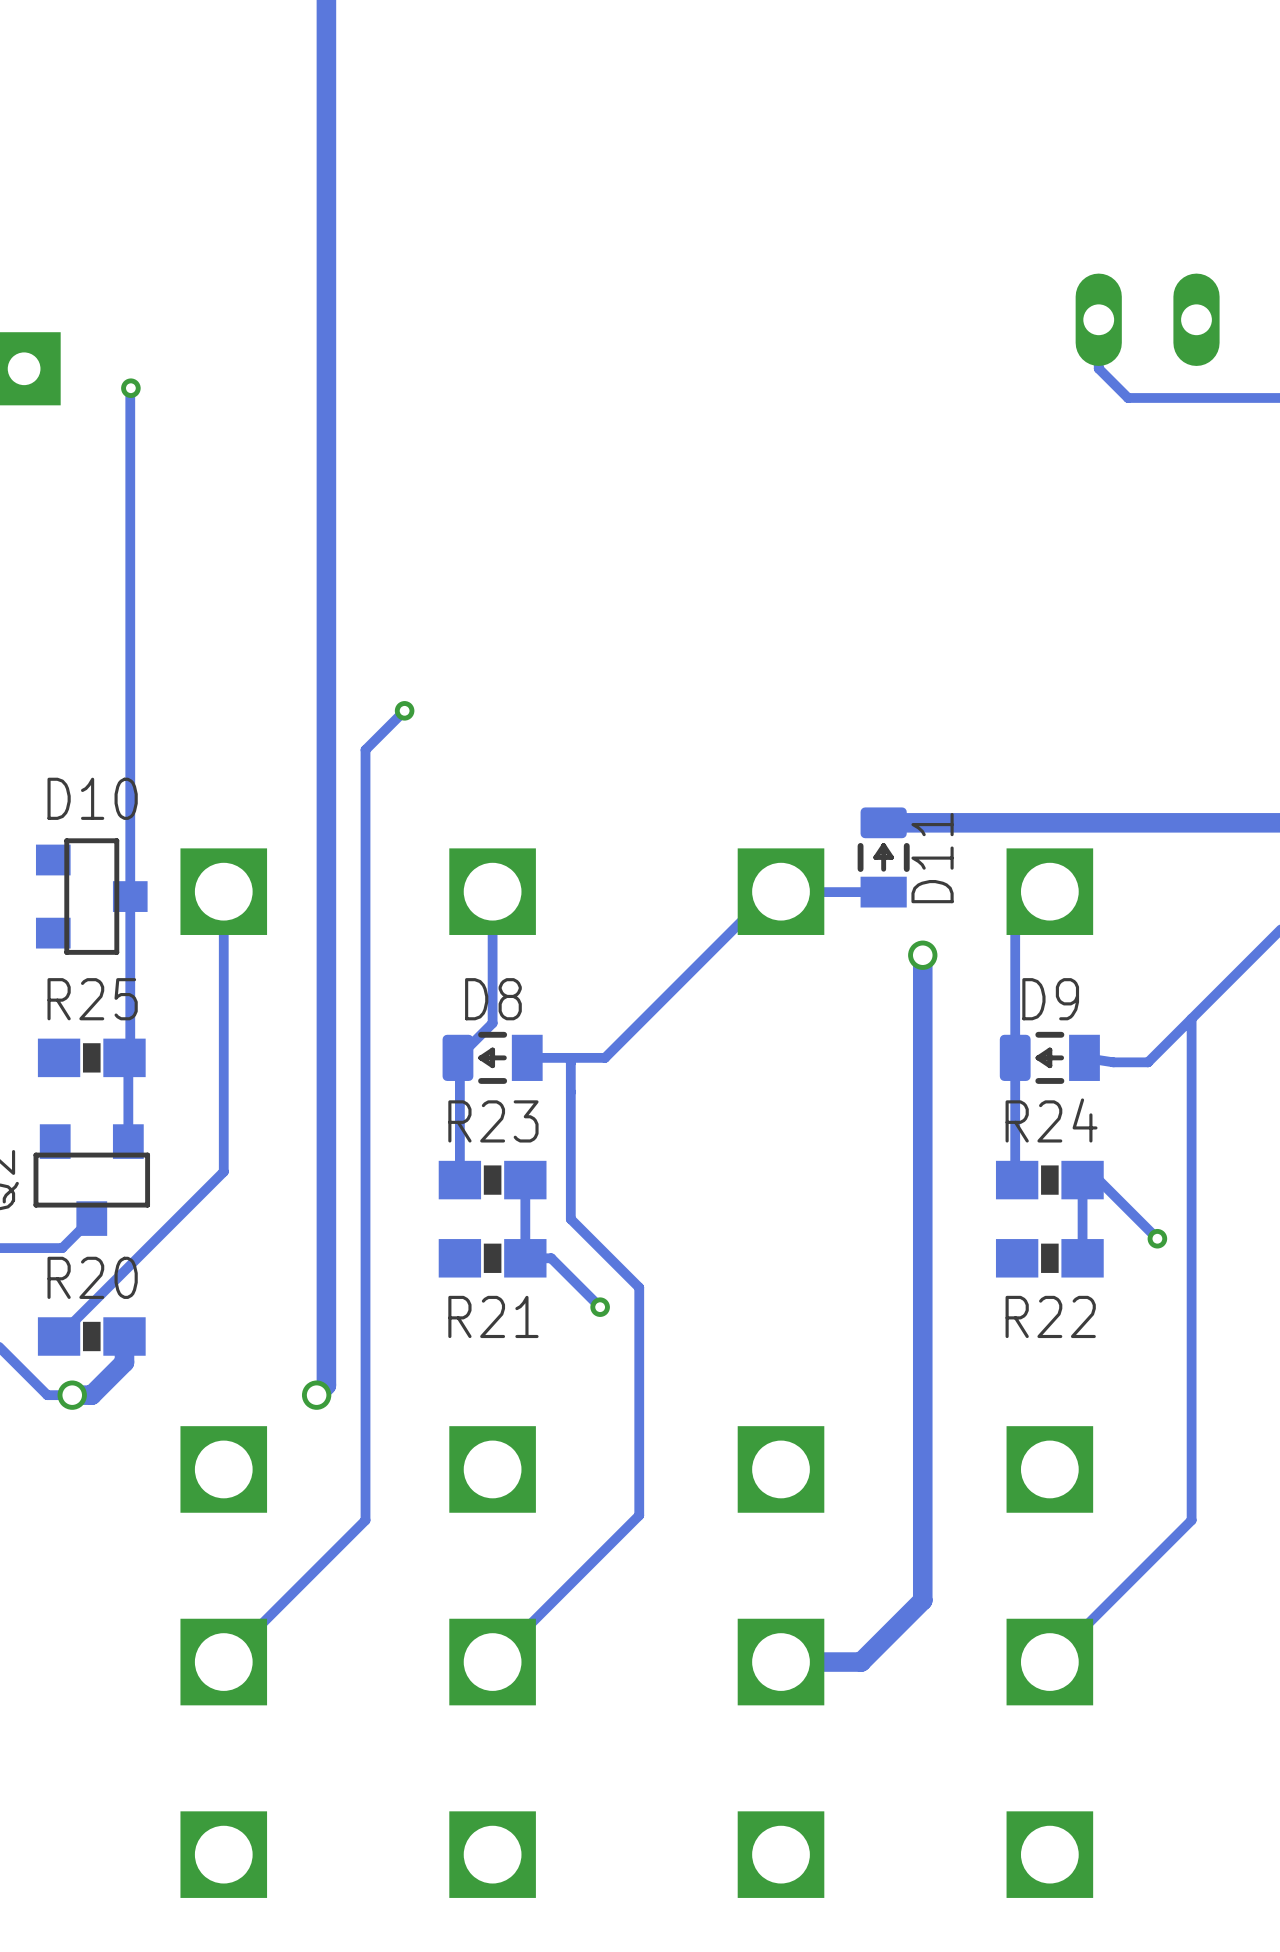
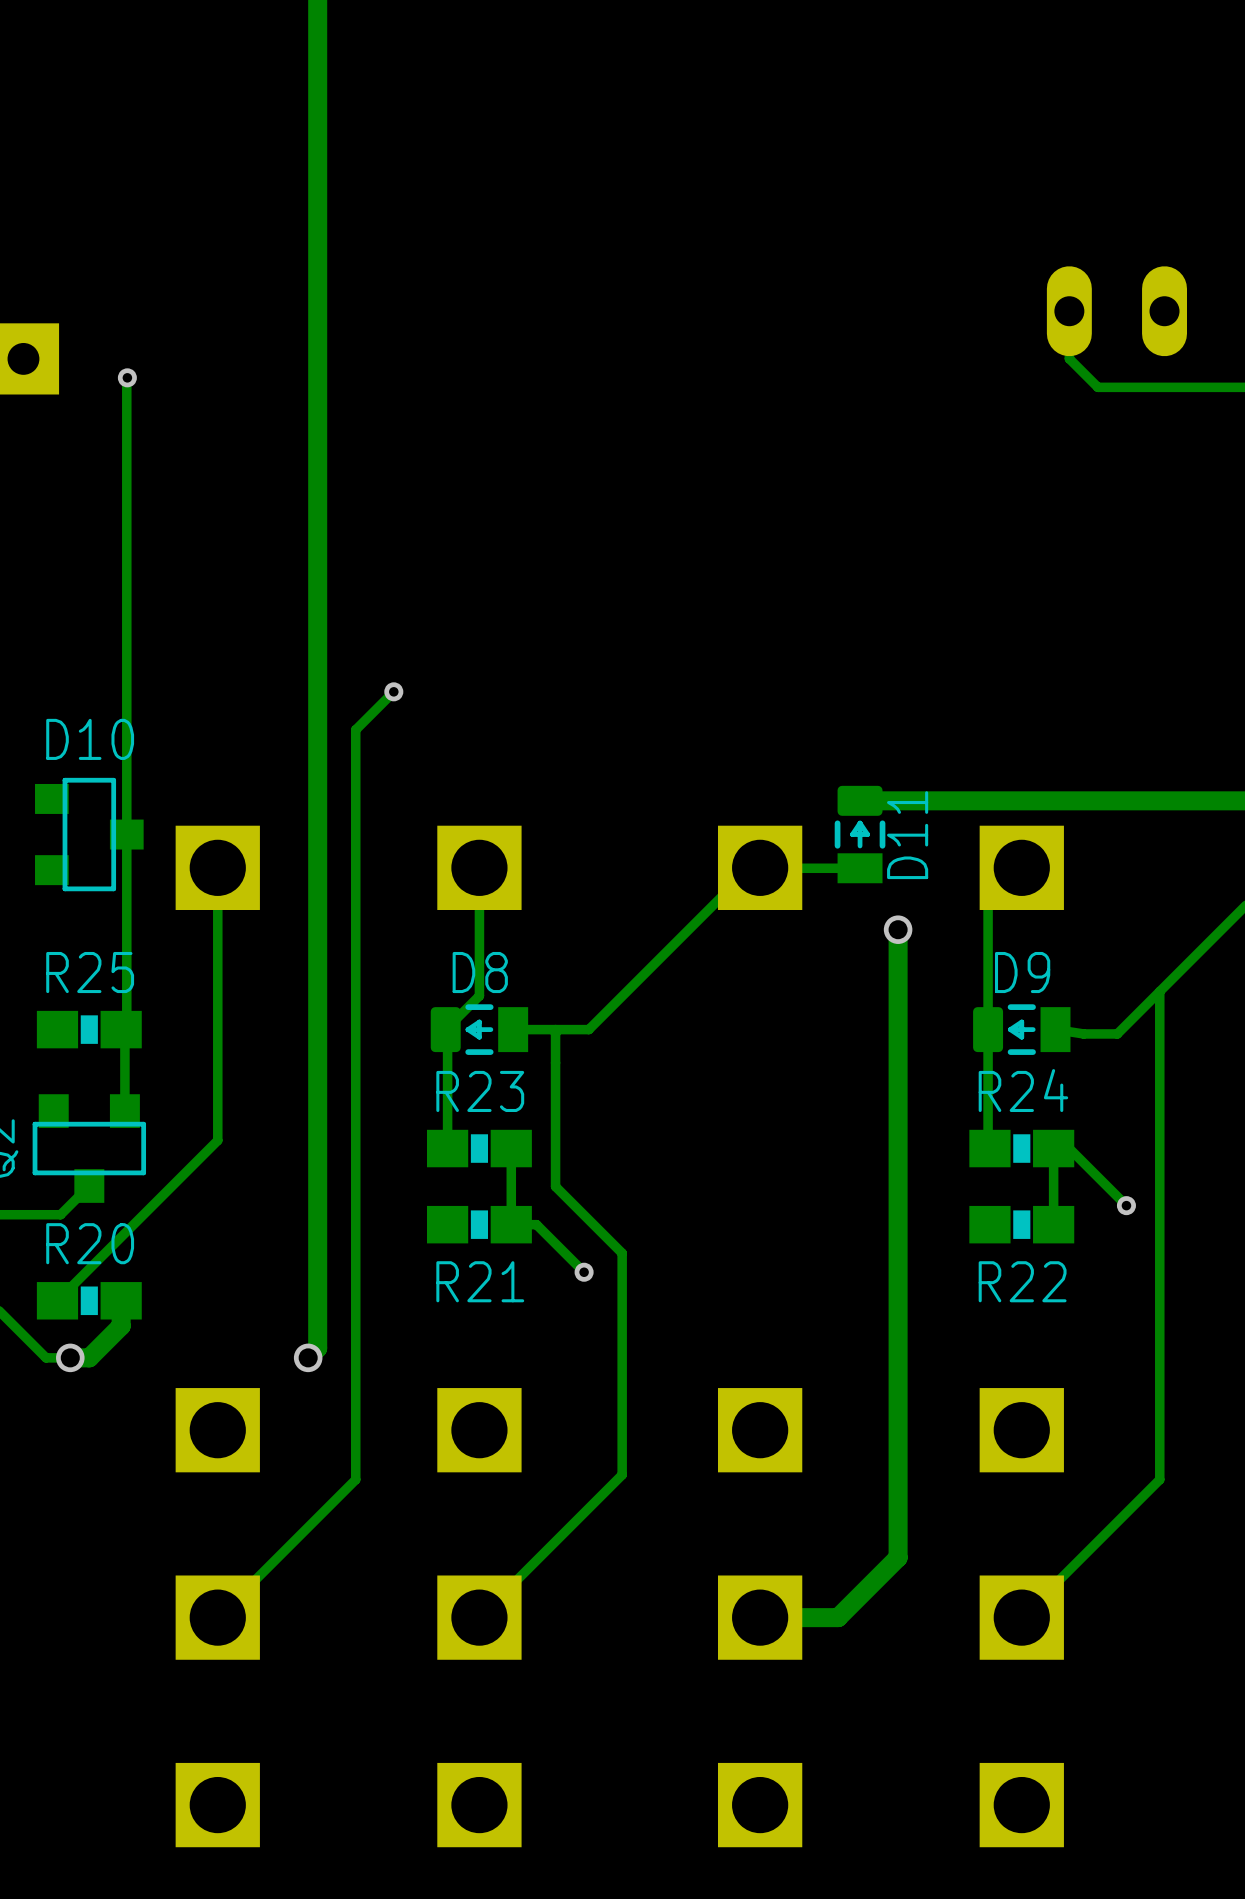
D10 position: (91, 896) -> (89, 834)

